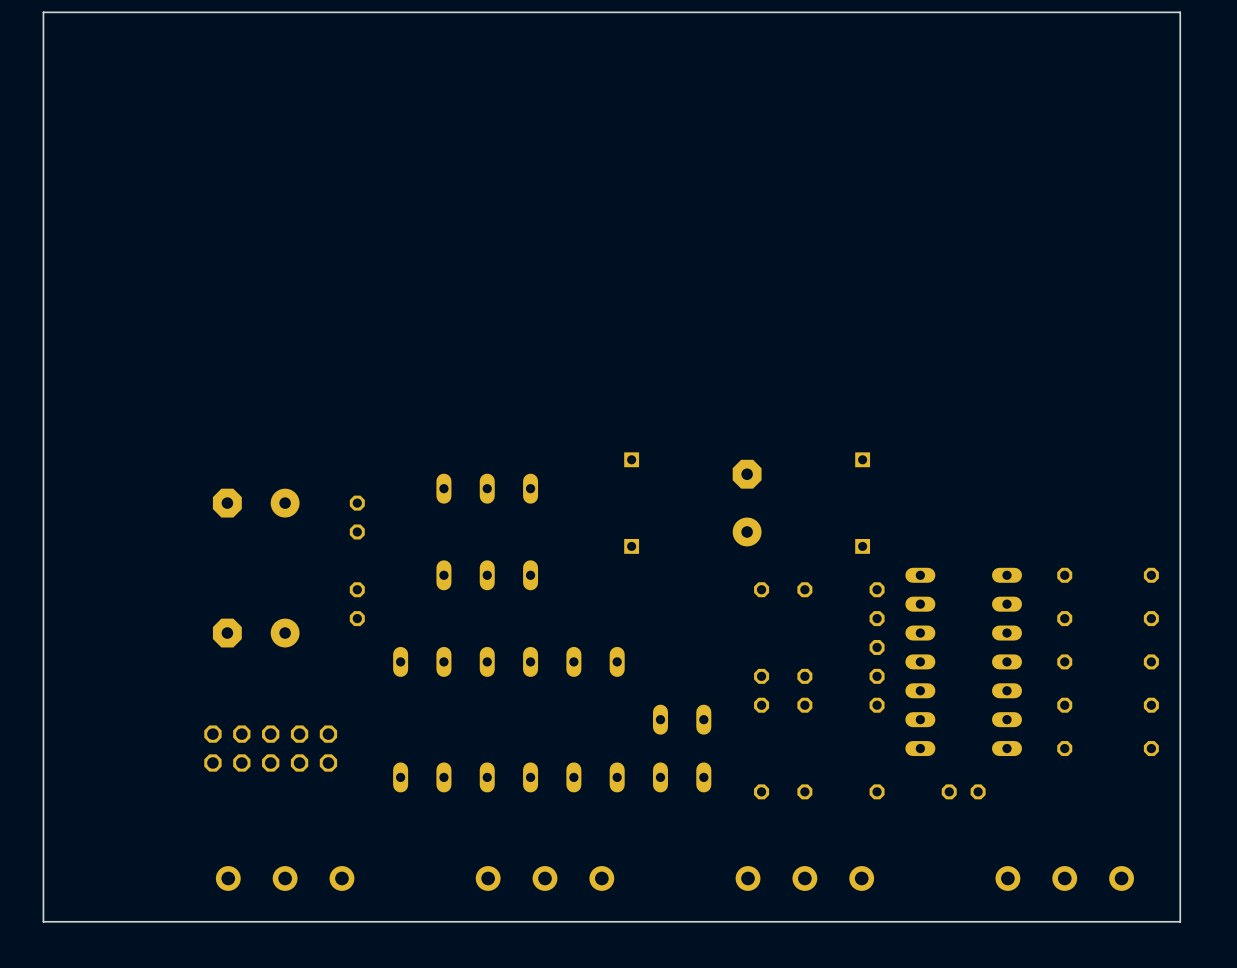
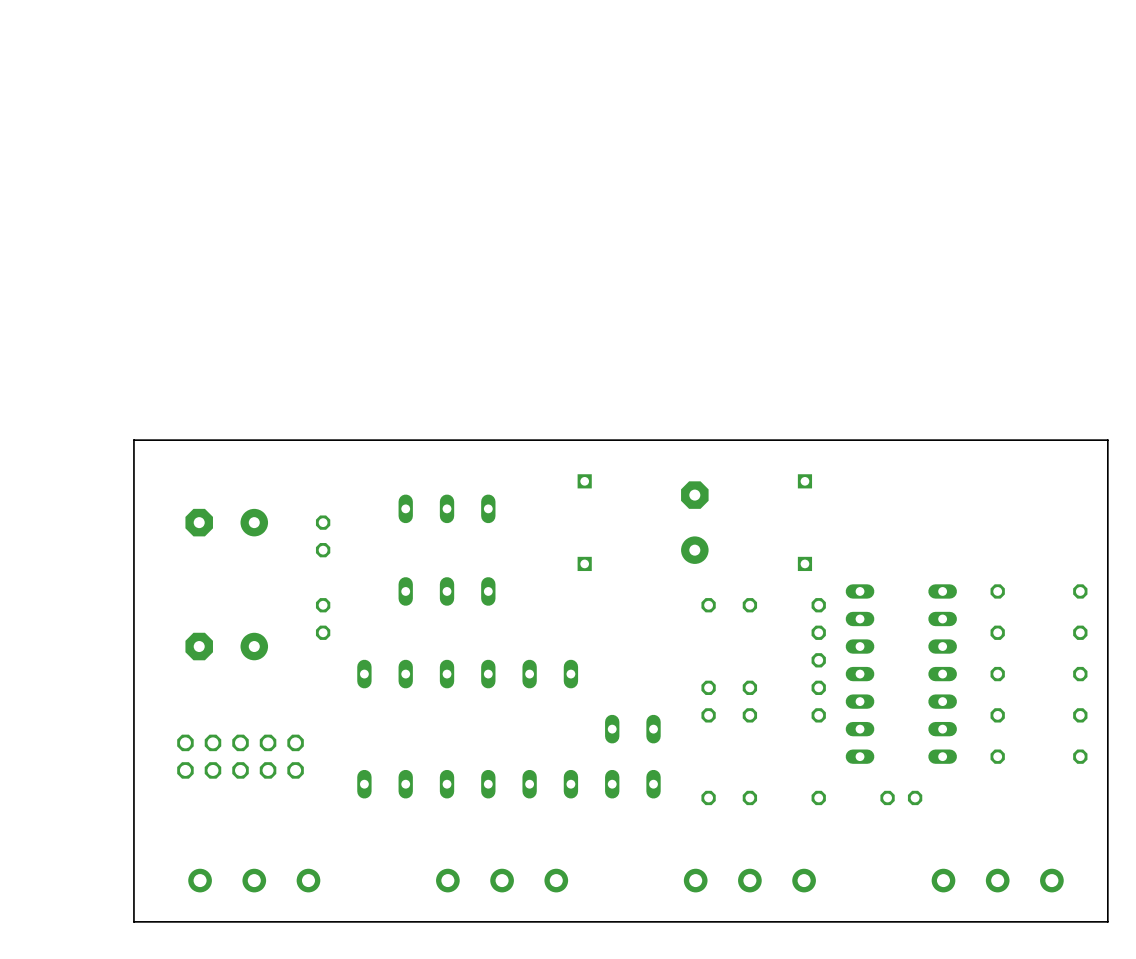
board edge: (1180, 416) (1180, 12) (43, 12) (43, 921) (158, 921) -> (1107, 440) (133, 440) (133, 921)

